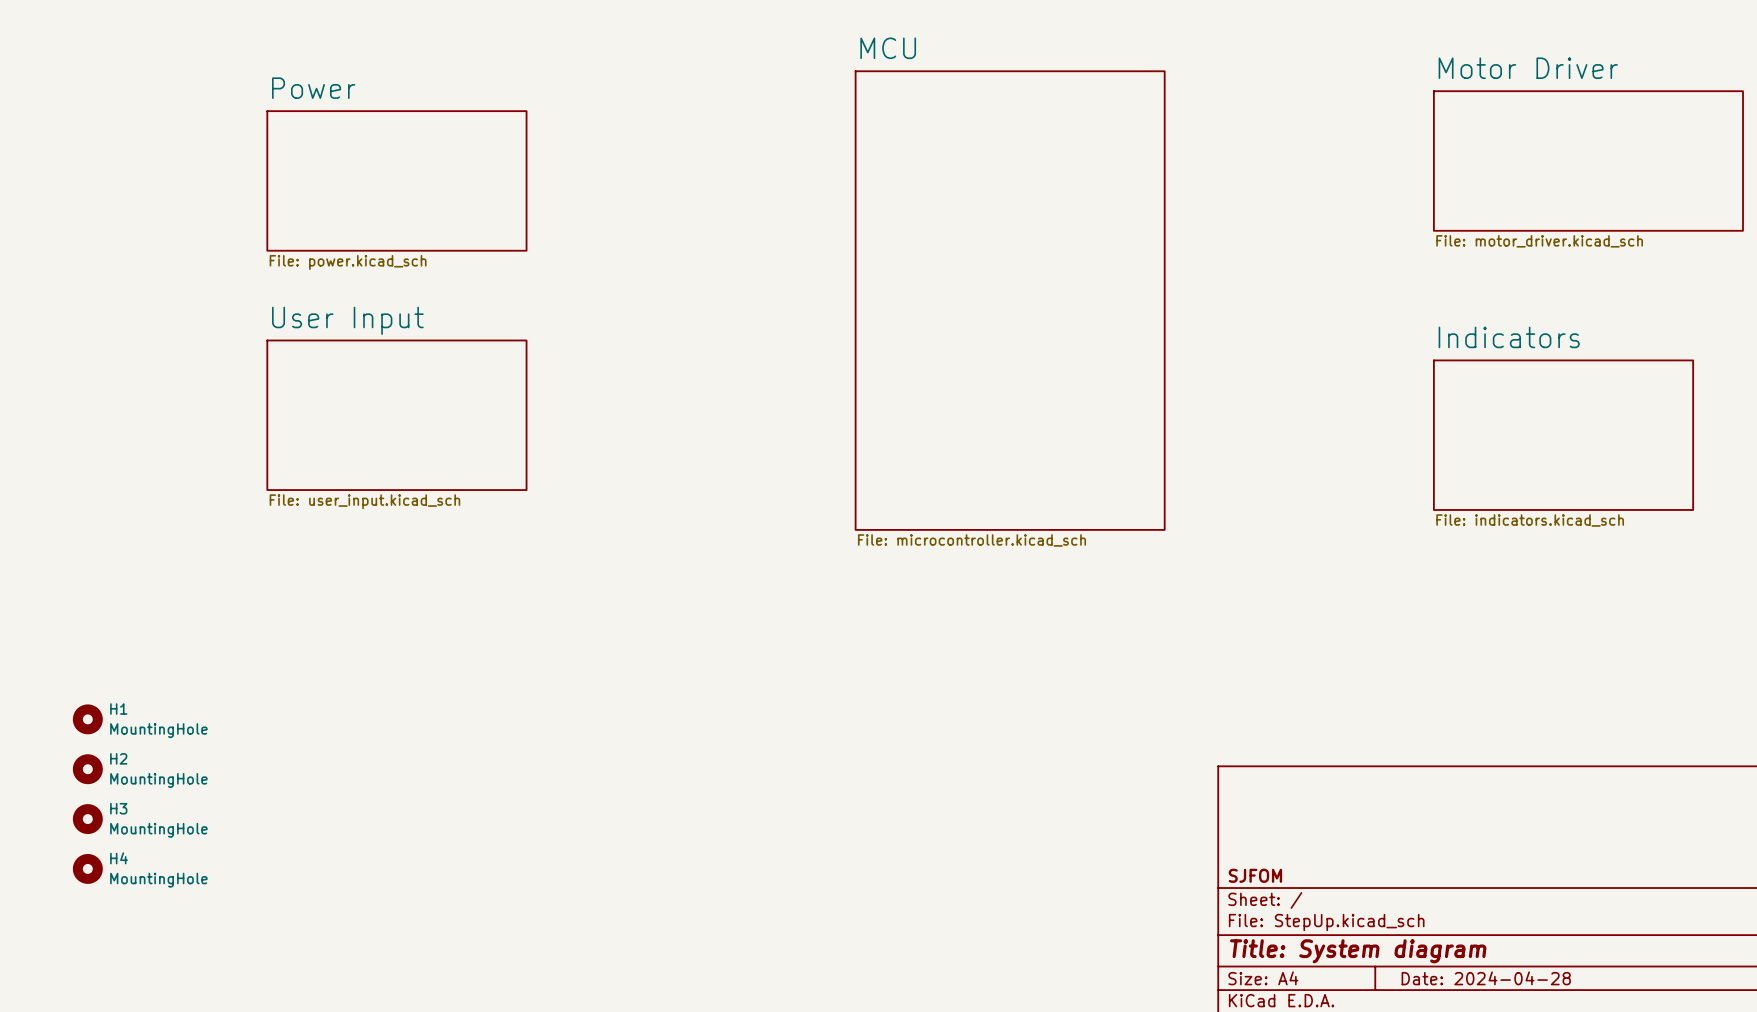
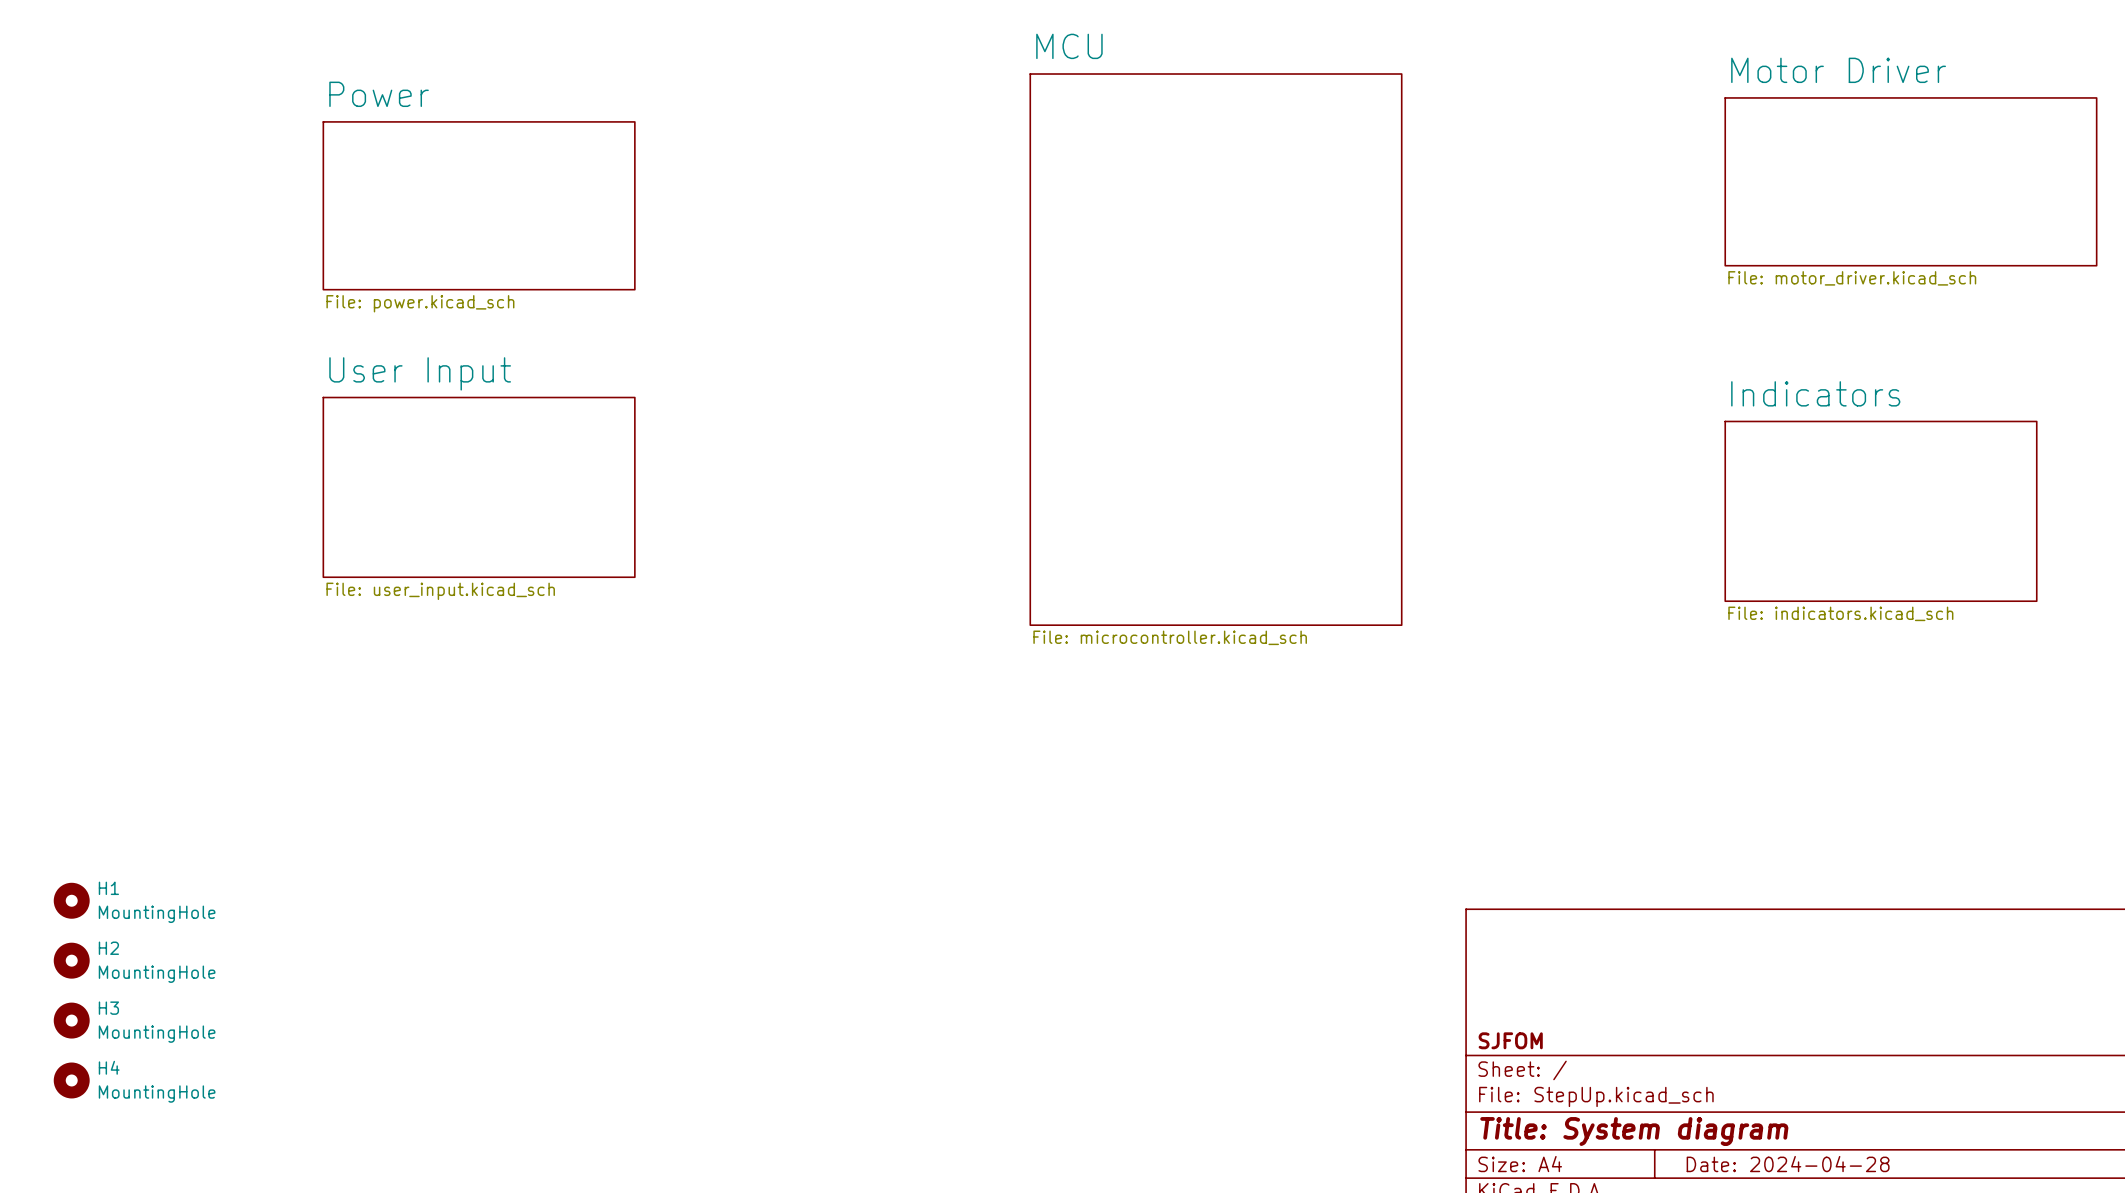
H1 position: (87, 719) -> (71, 900)
H2 position: (87, 769) -> (71, 960)
H3 position: (87, 819) -> (71, 1020)
H4 position: (87, 868) -> (71, 1080)

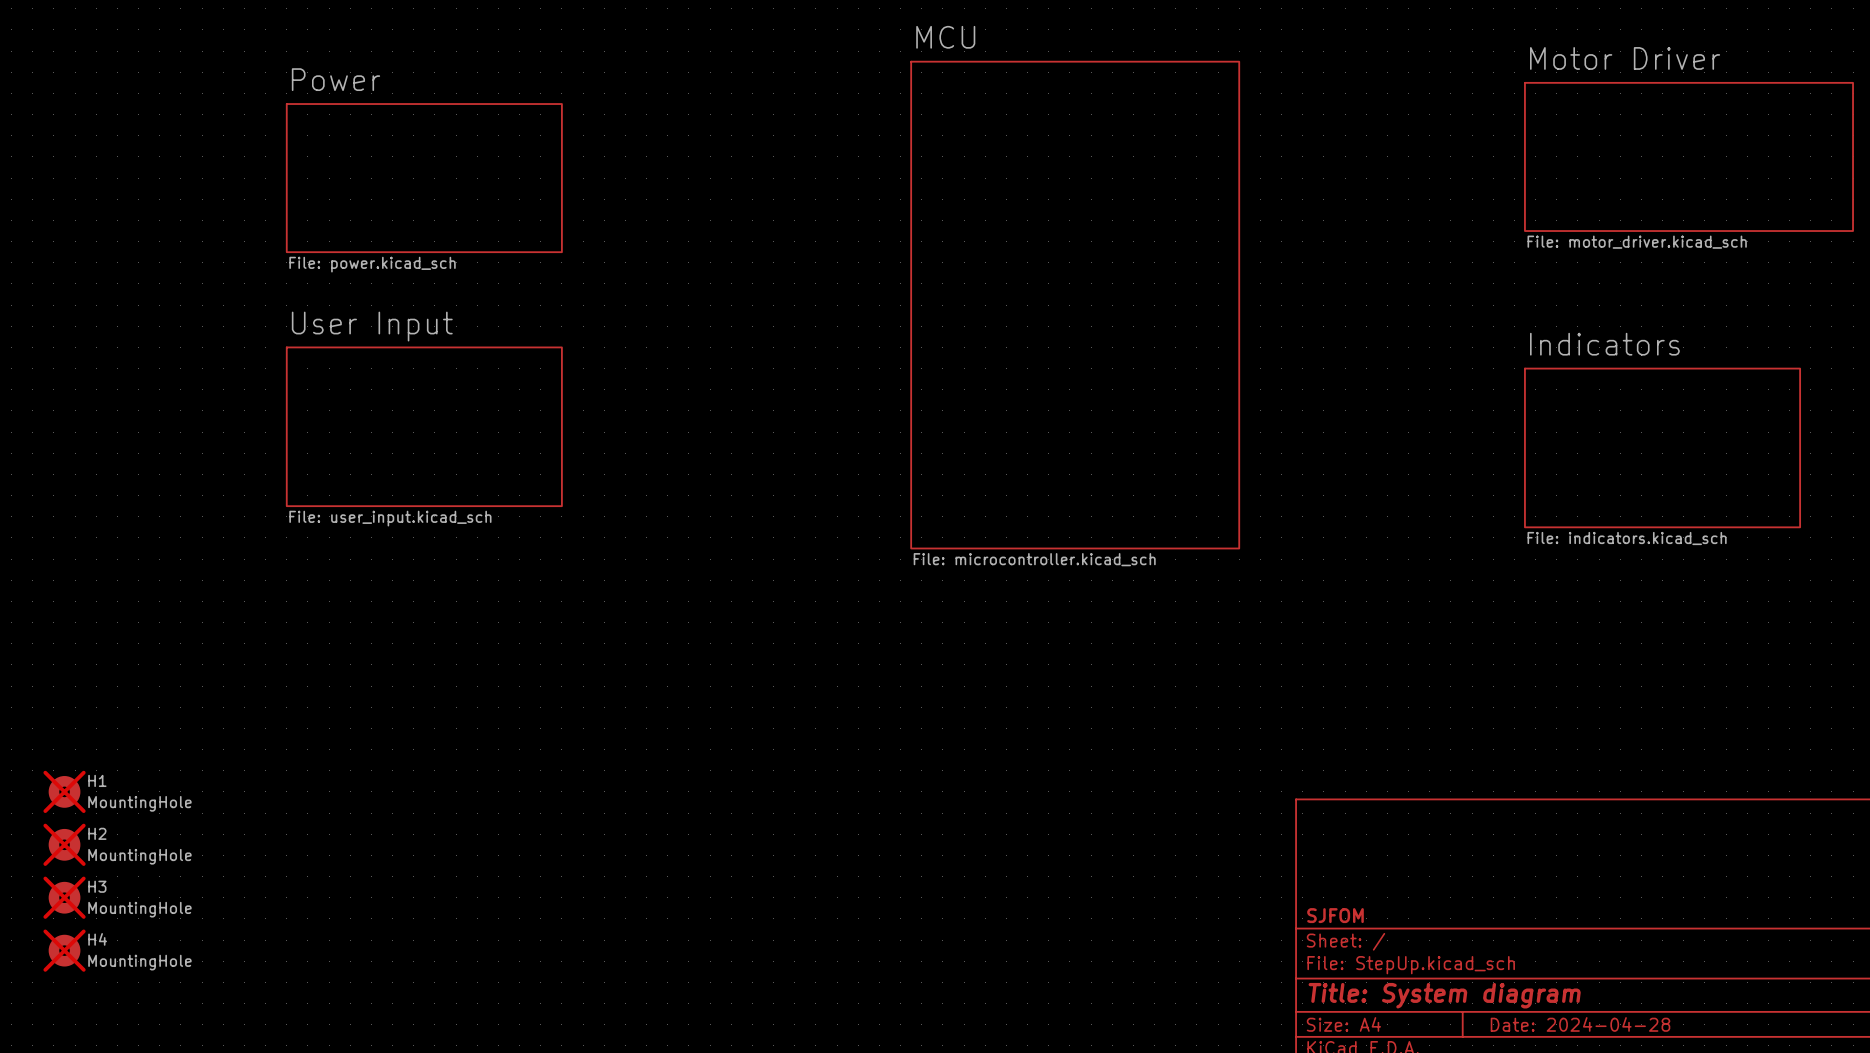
H1 do-not-place cross: none -> (64, 791)
H2 do-not-place cross: none -> (64, 844)
H3 do-not-place cross: none -> (64, 897)
H4 do-not-place cross: none -> (64, 950)

